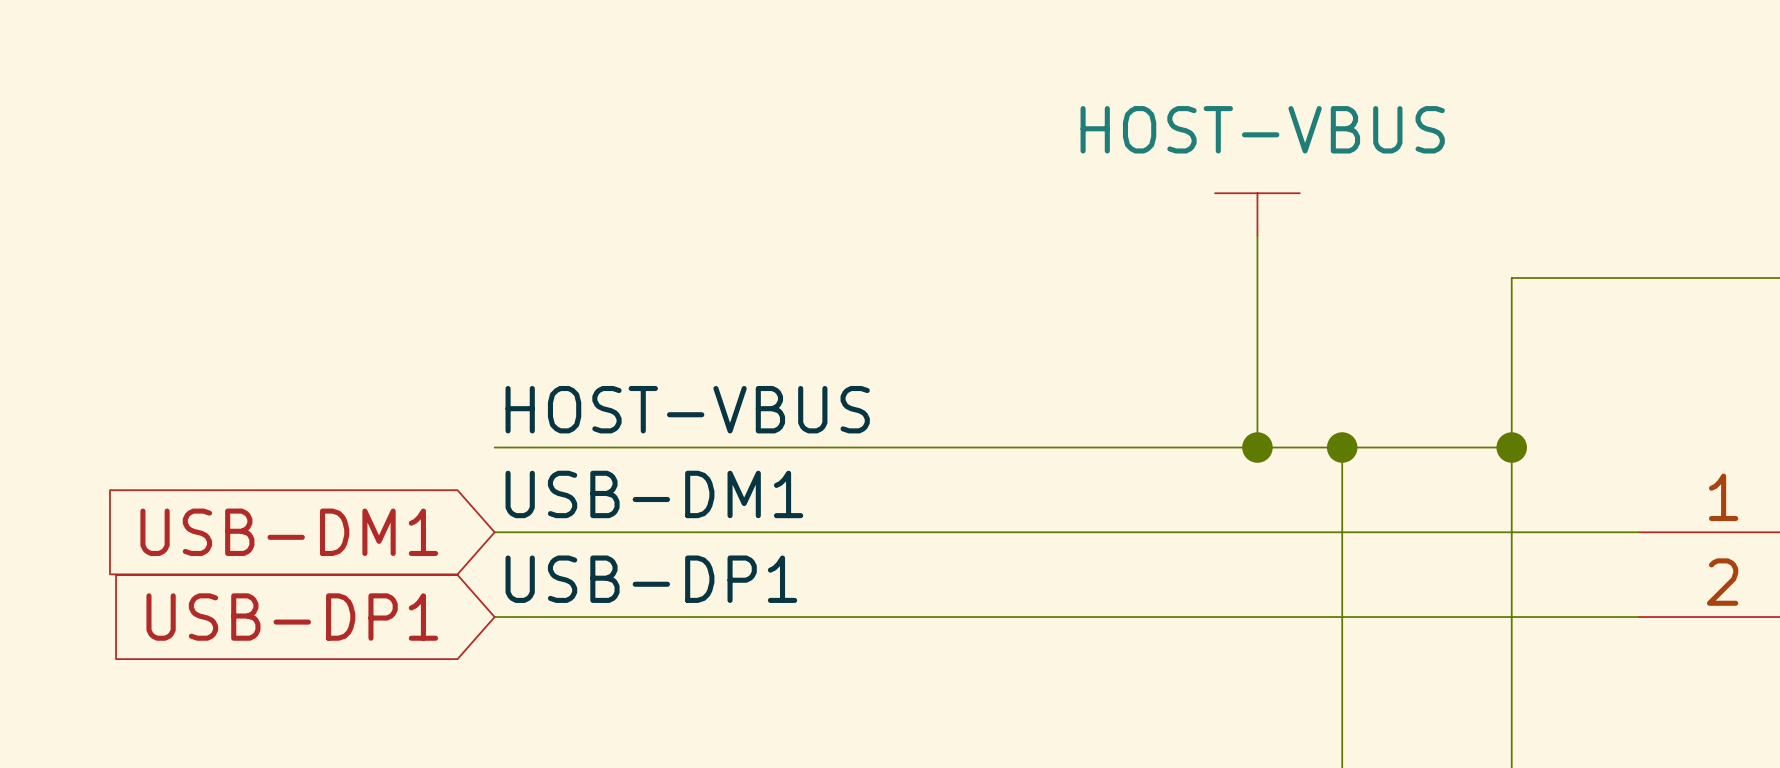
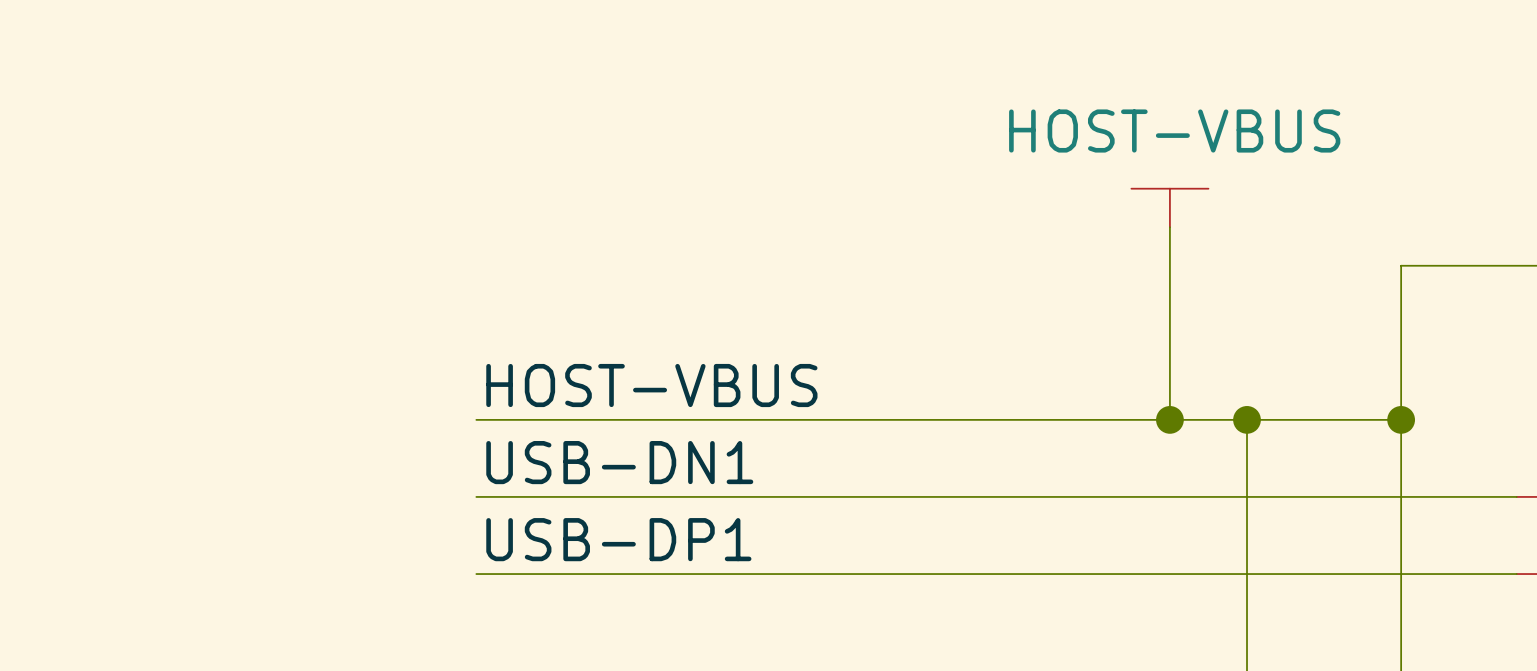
label: USB-DM1 (654, 494) -> USB-DN1 (619, 462)
global label: USB-DM1 (289, 532) -> none
global label: USB-DP1 (292, 617) -> none

